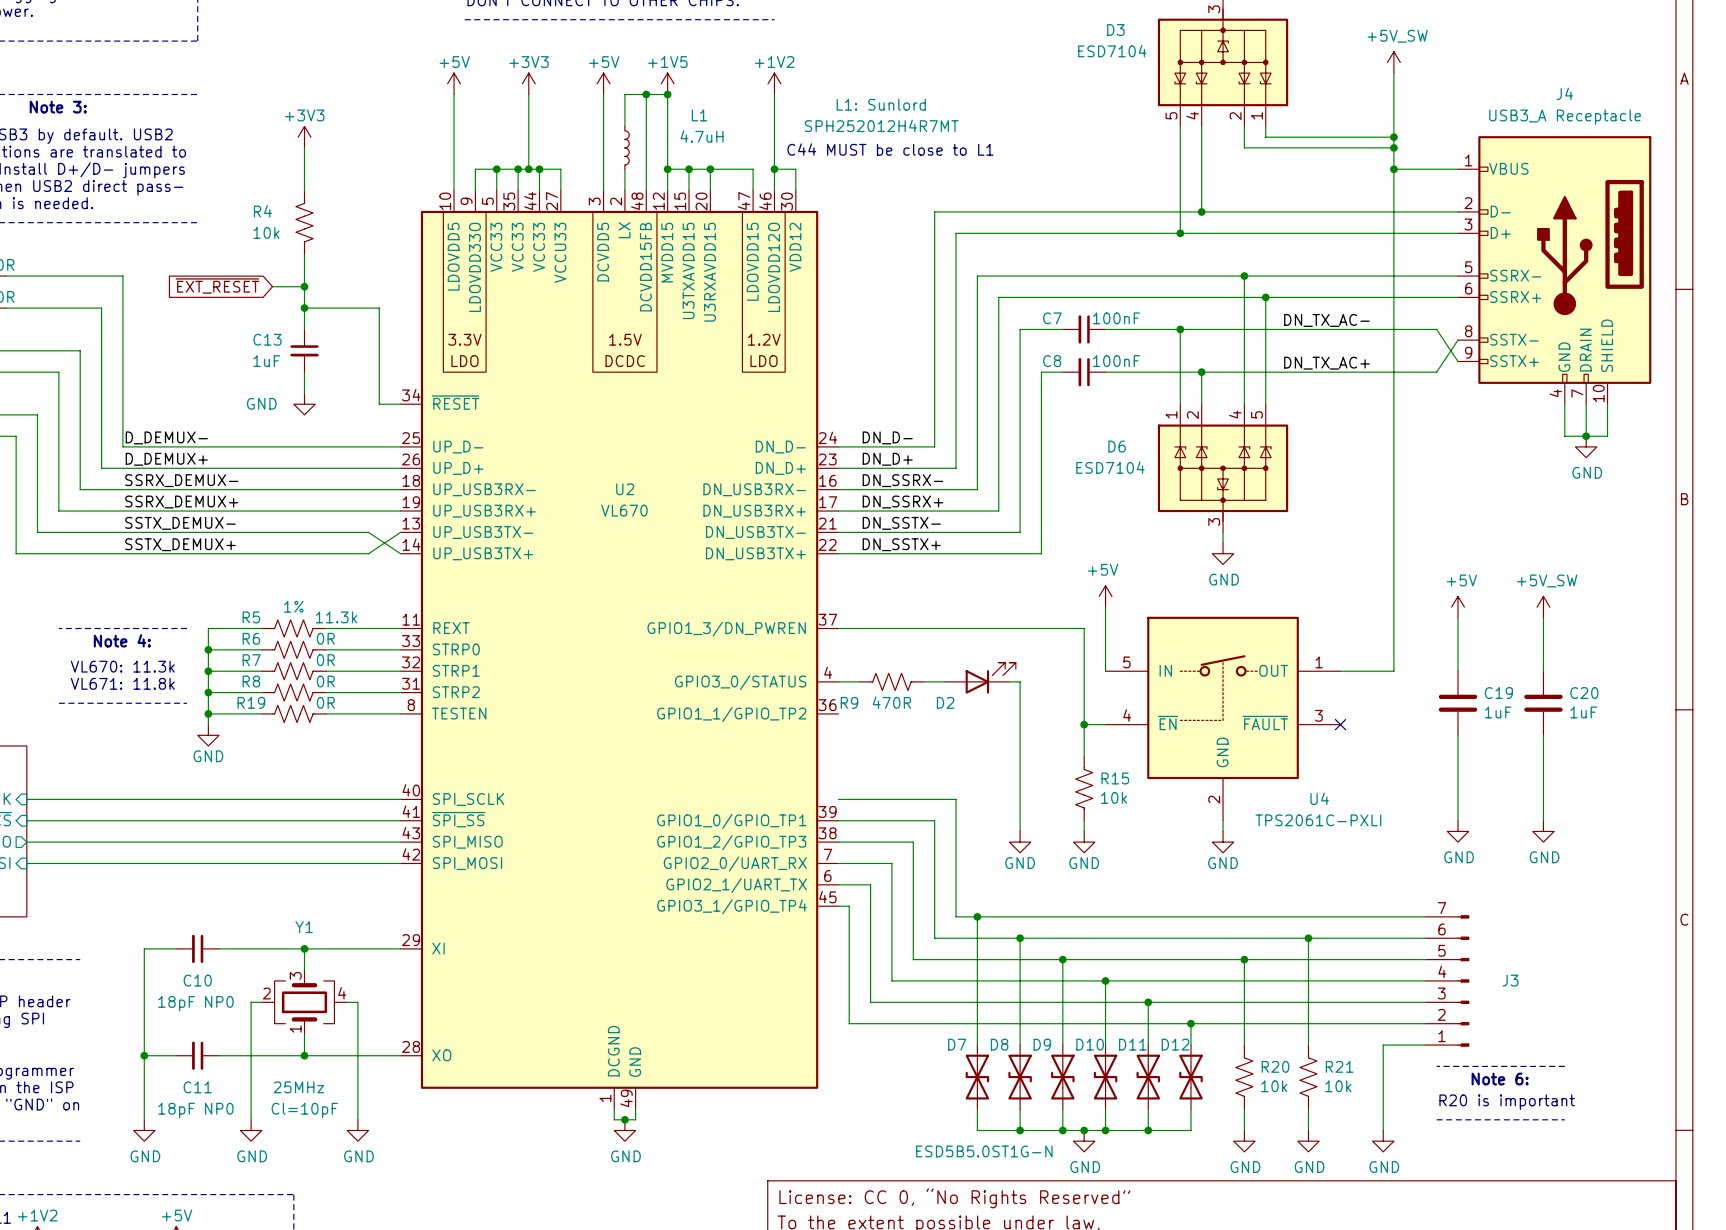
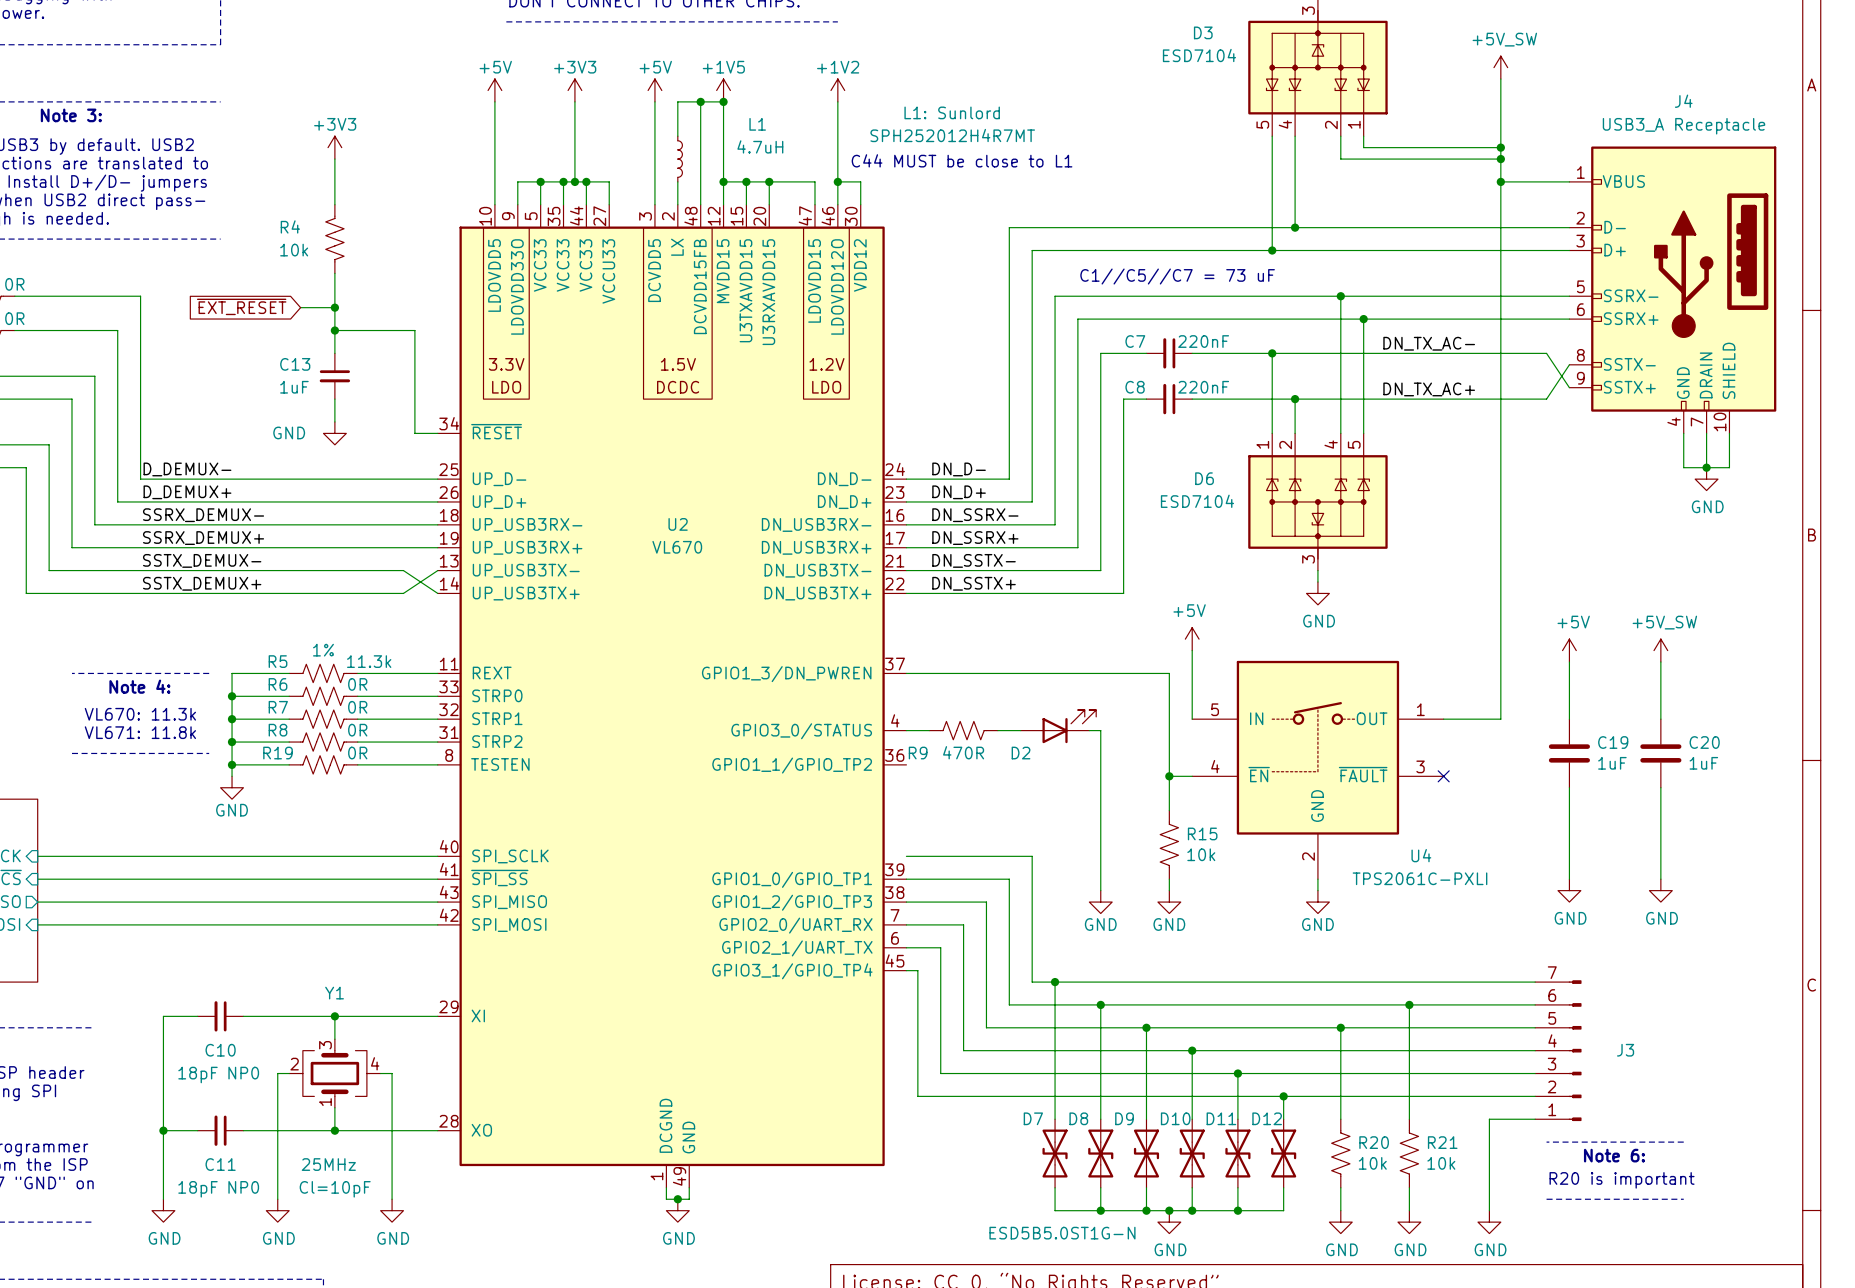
text: none -> C1//C5//C7 = 73 uF (1177, 276)
C7 value: 100nF (1116, 318) -> 220nF (1203, 341)
C8 value: 100nF (1116, 361) -> 220nF (1203, 387)

